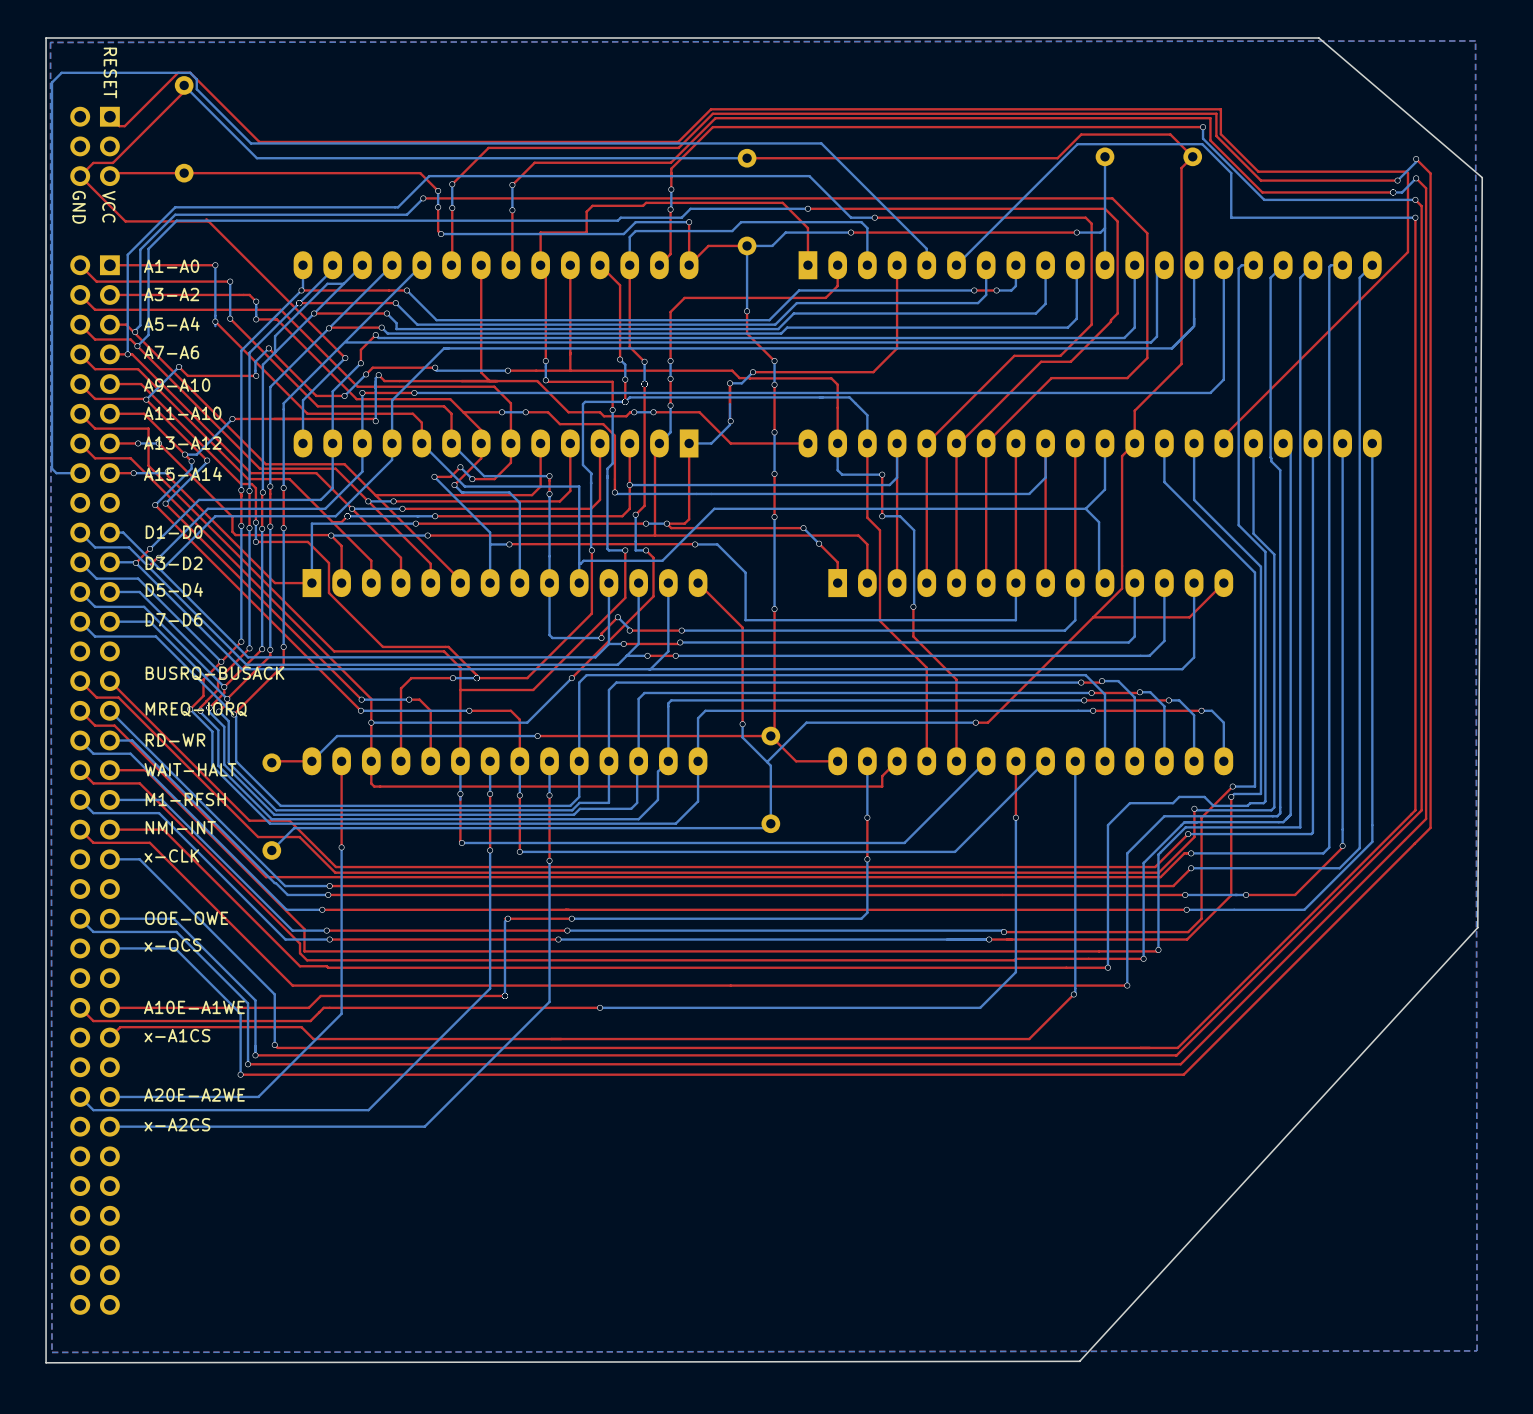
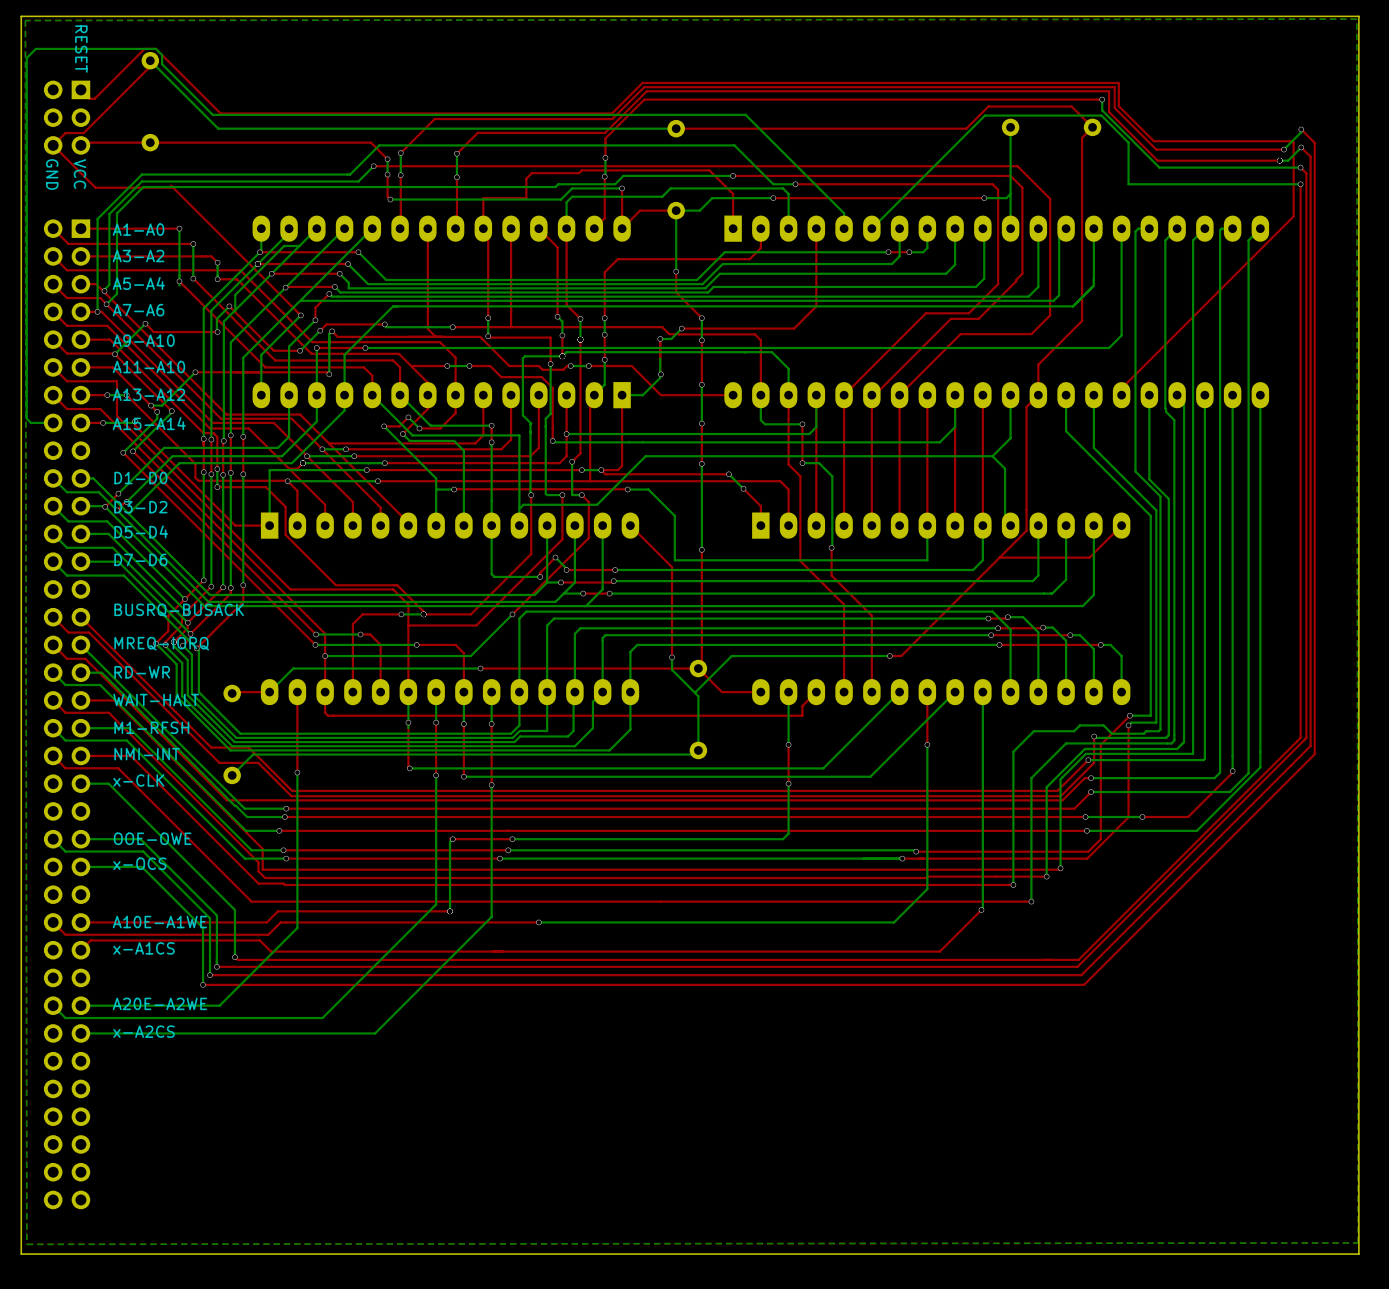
board edge: (1318, 38) (1482, 177) (1477, 927) (1079, 1361) (46, 1362) -> (1210, 16) (1358, 16) (1358, 1254) (21, 1254)

